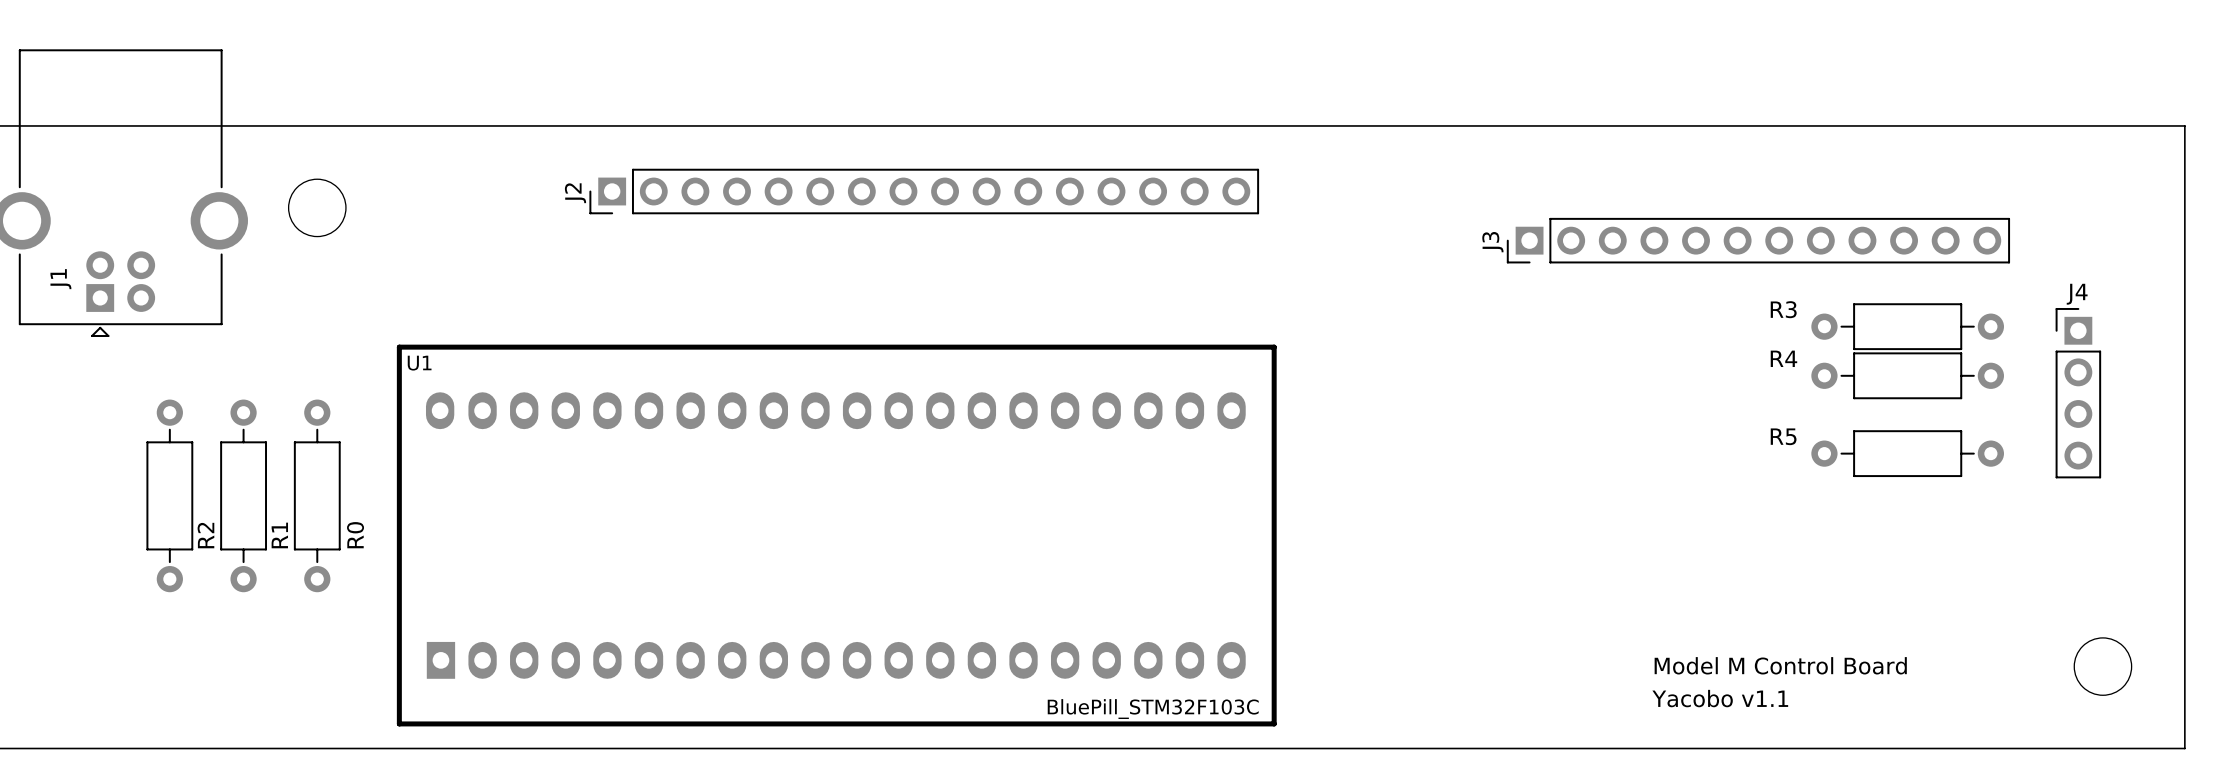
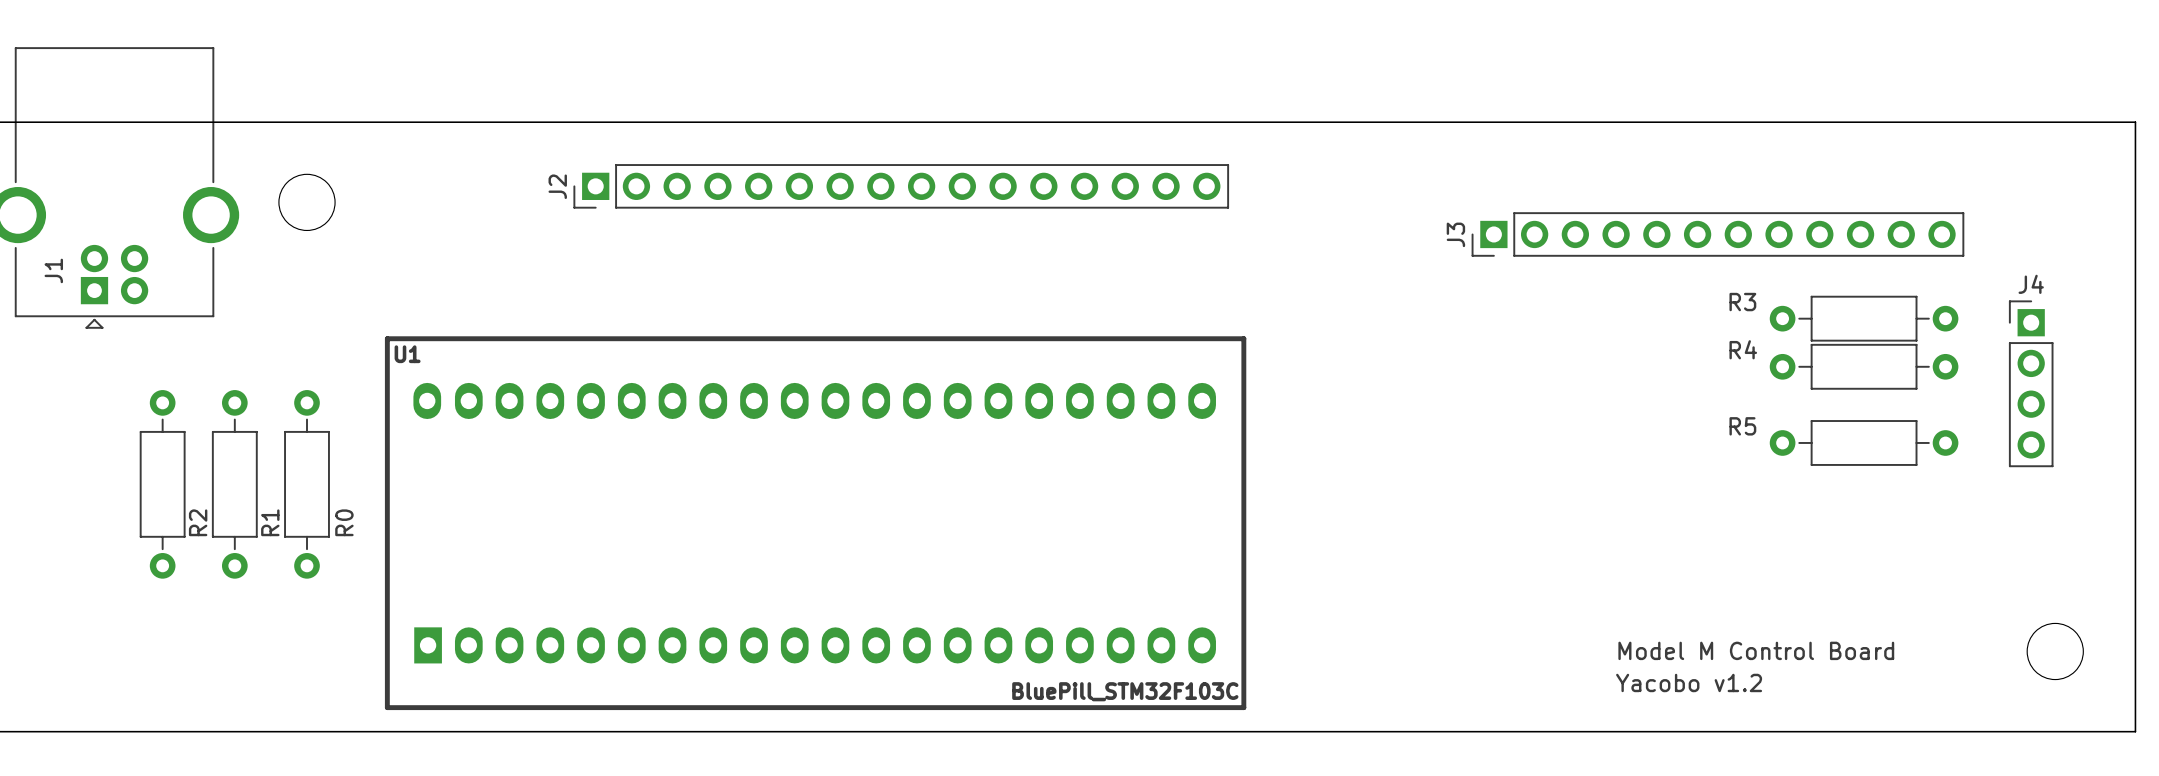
text: Yacobo v1.1 (1720, 698) -> Yacobo v1.2 (1689, 682)

